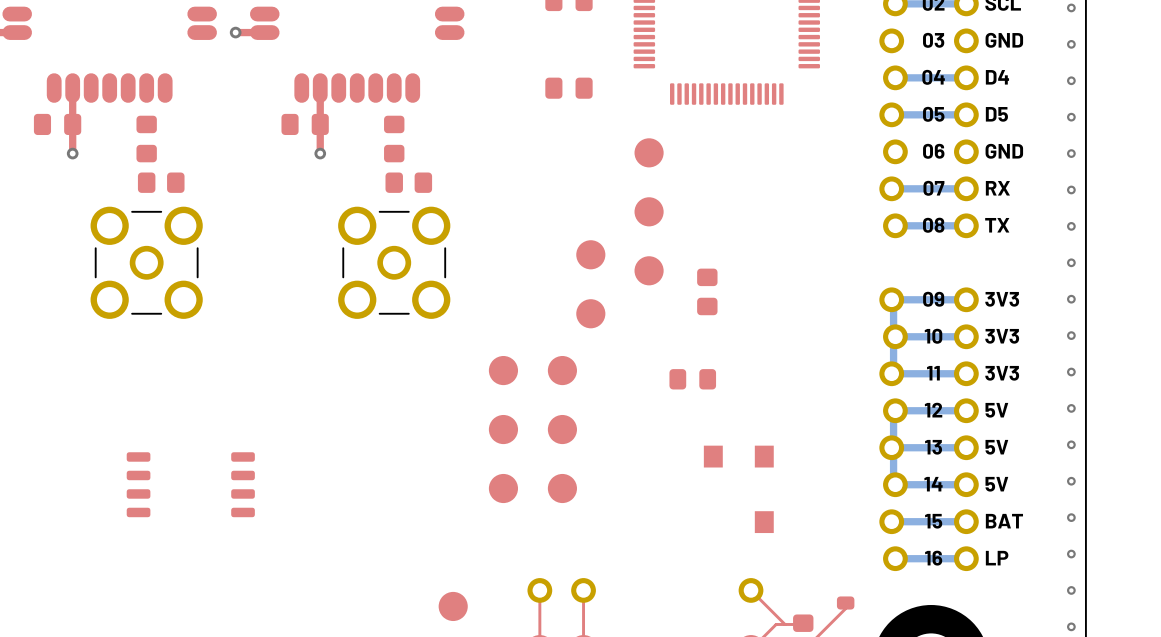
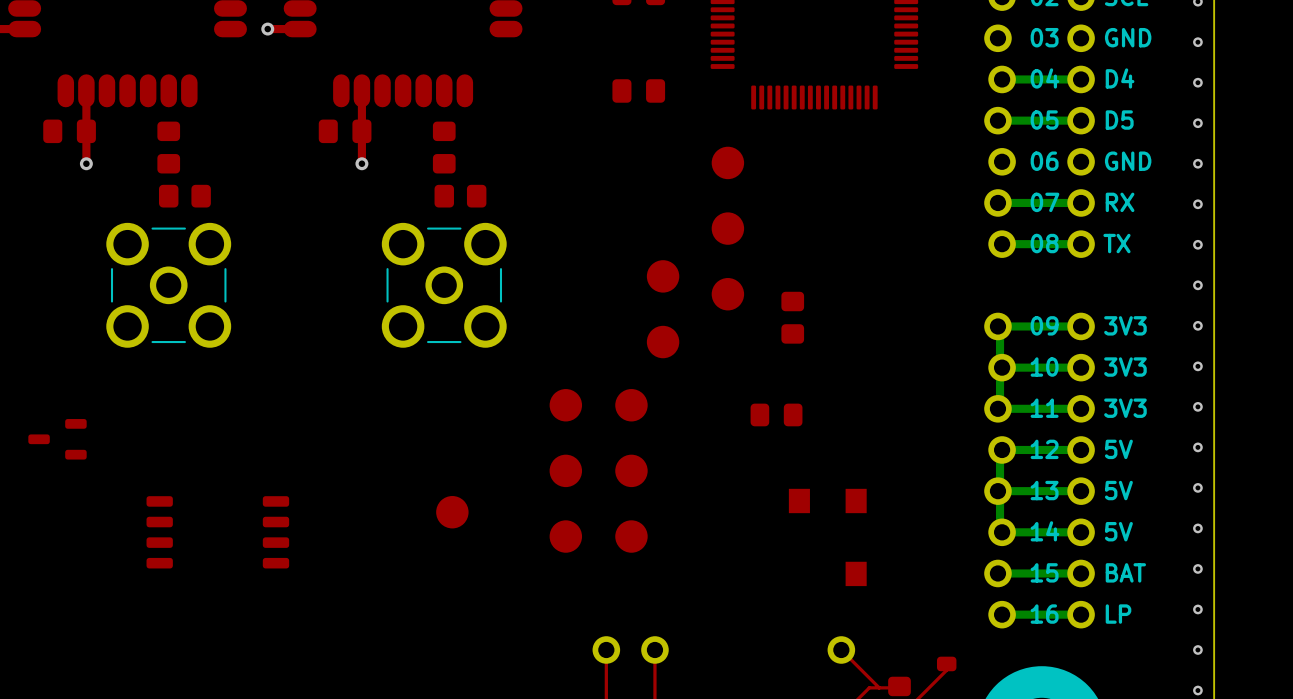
part: none -> (57, 439)
part position: (453, 606) -> (452, 512)

